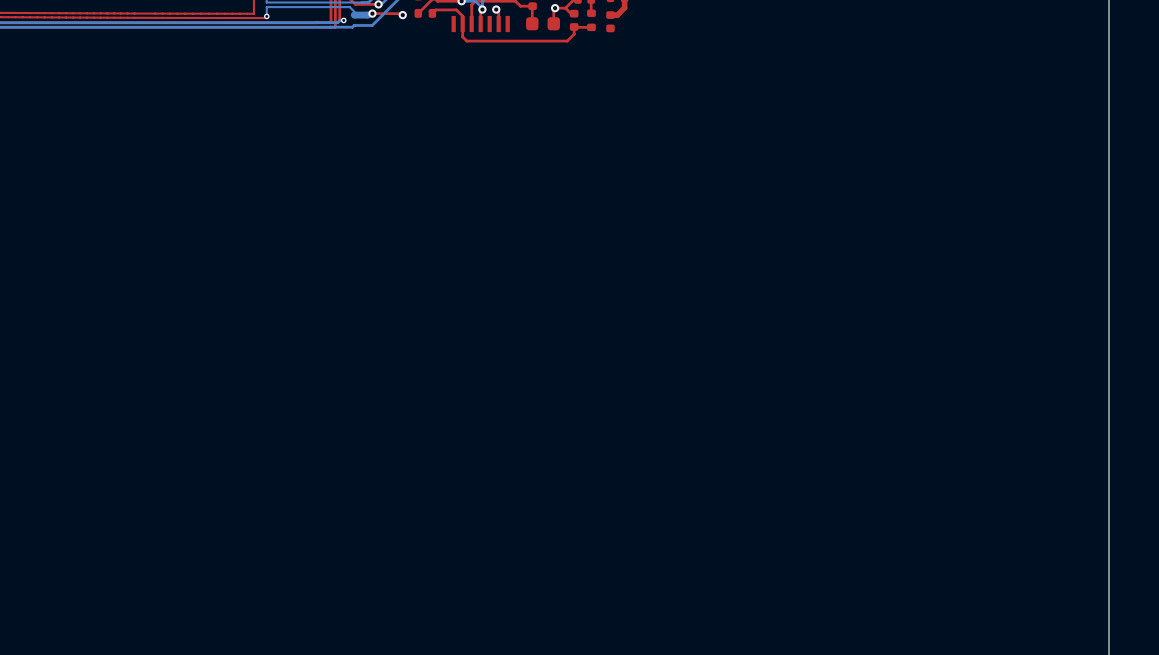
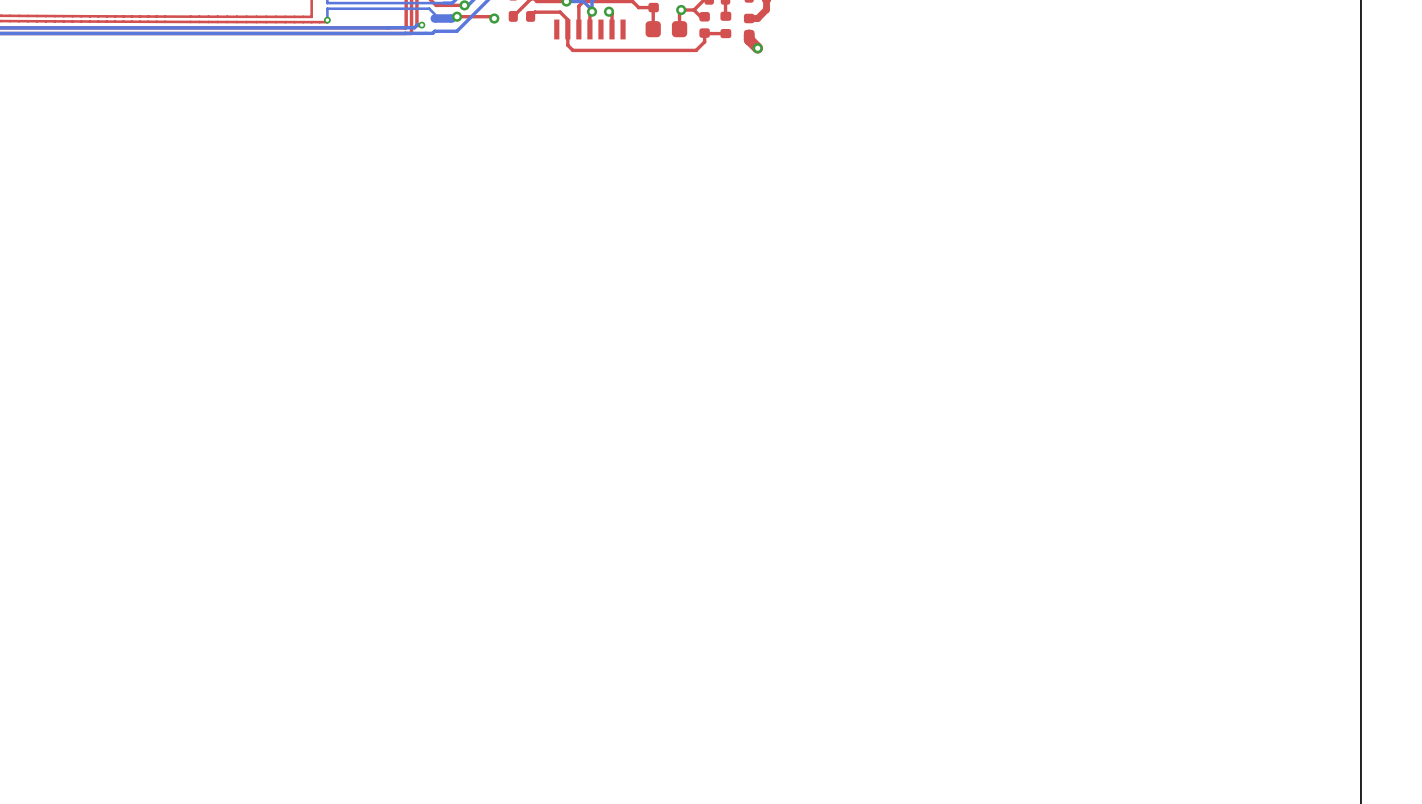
top track: none -> (749, 34) (749, 39) (757, 48)
via: none -> (757, 48)

